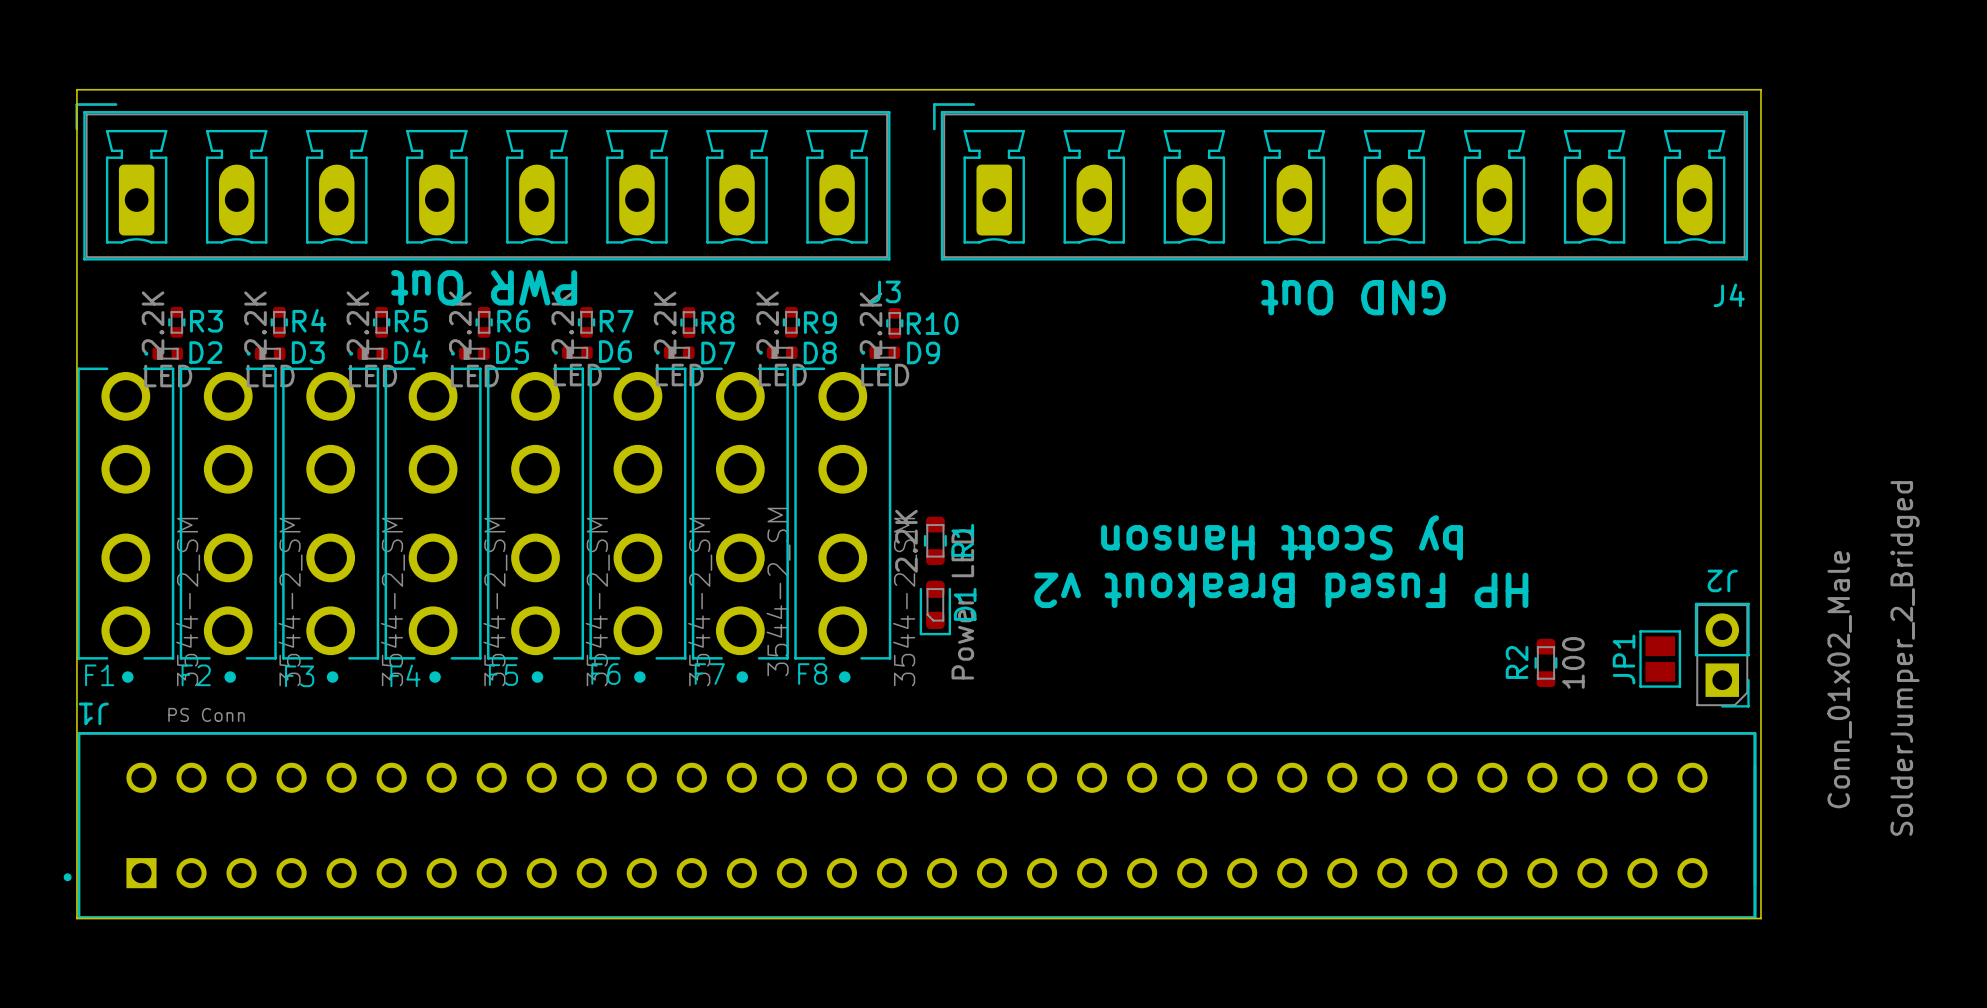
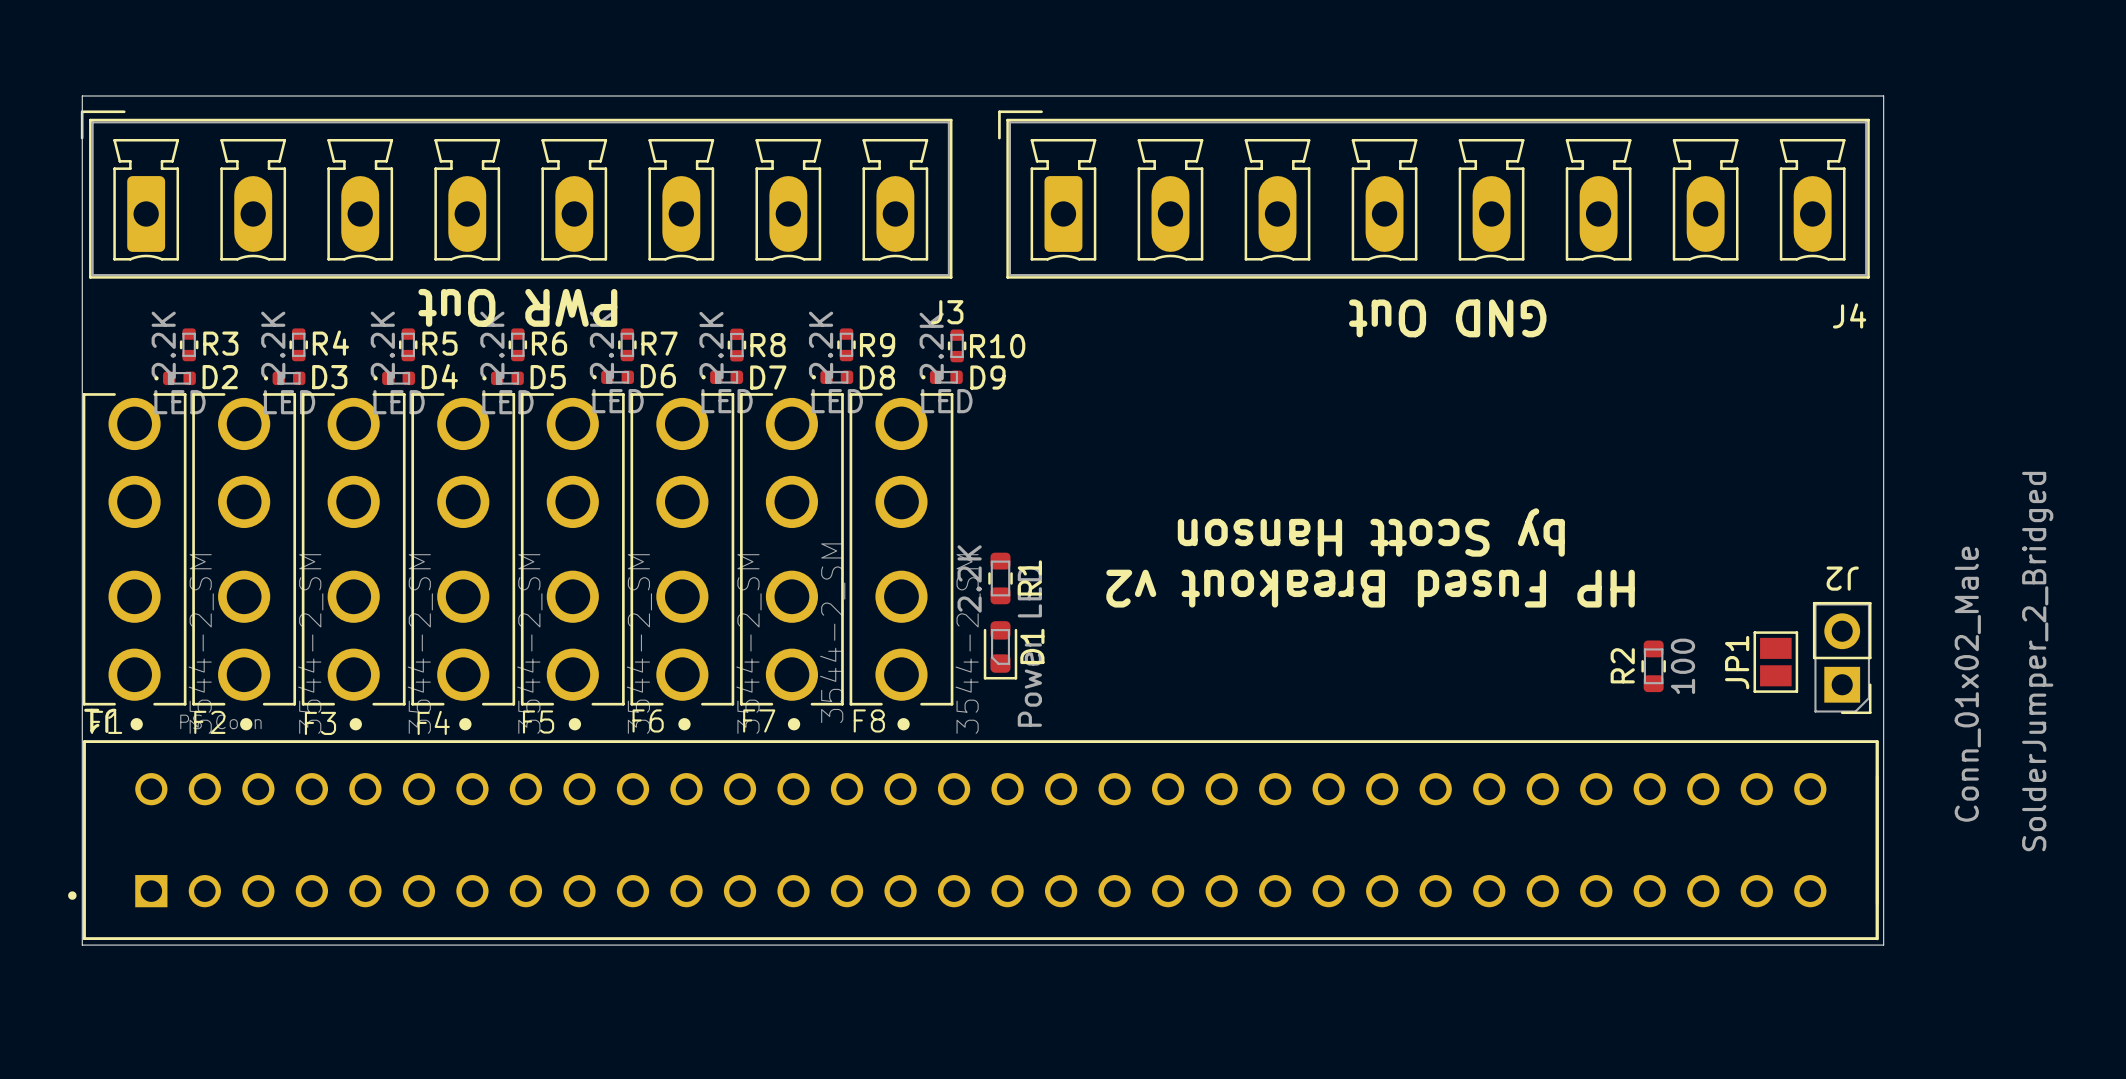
text: none -> by Scott Hanson (1371, 532)
text: by Scott Hanson (1282, 537) -> HP Fused Breakout v2 (1370, 588)
text: HP Fused Breakout v2 (1281, 590) -> none
J2 position: (1722, 655) -> (1842, 657)
JP1 position: (1660, 659) -> (1775, 662)
R2 position: (1545, 662) -> (1653, 666)
J1 position: (910, 825) -> (973, 840)
board edge: (76, 883) (76, 918) (1760, 918) (1760, 883) -> (82, 945) (1883, 945)

